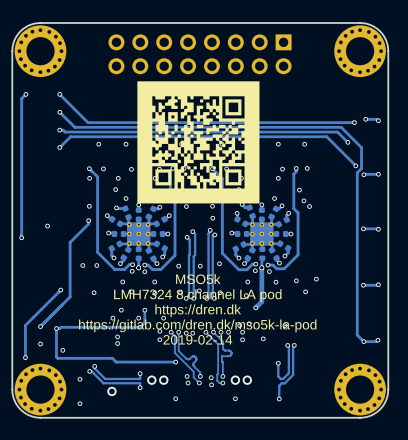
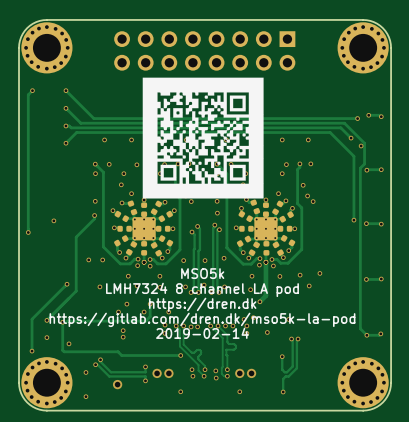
track: (350, 160) (355, 165) -> (353, 156) (353, 220)
via position: (355, 165) -> (361, 145)
via: none -> (353, 220)

